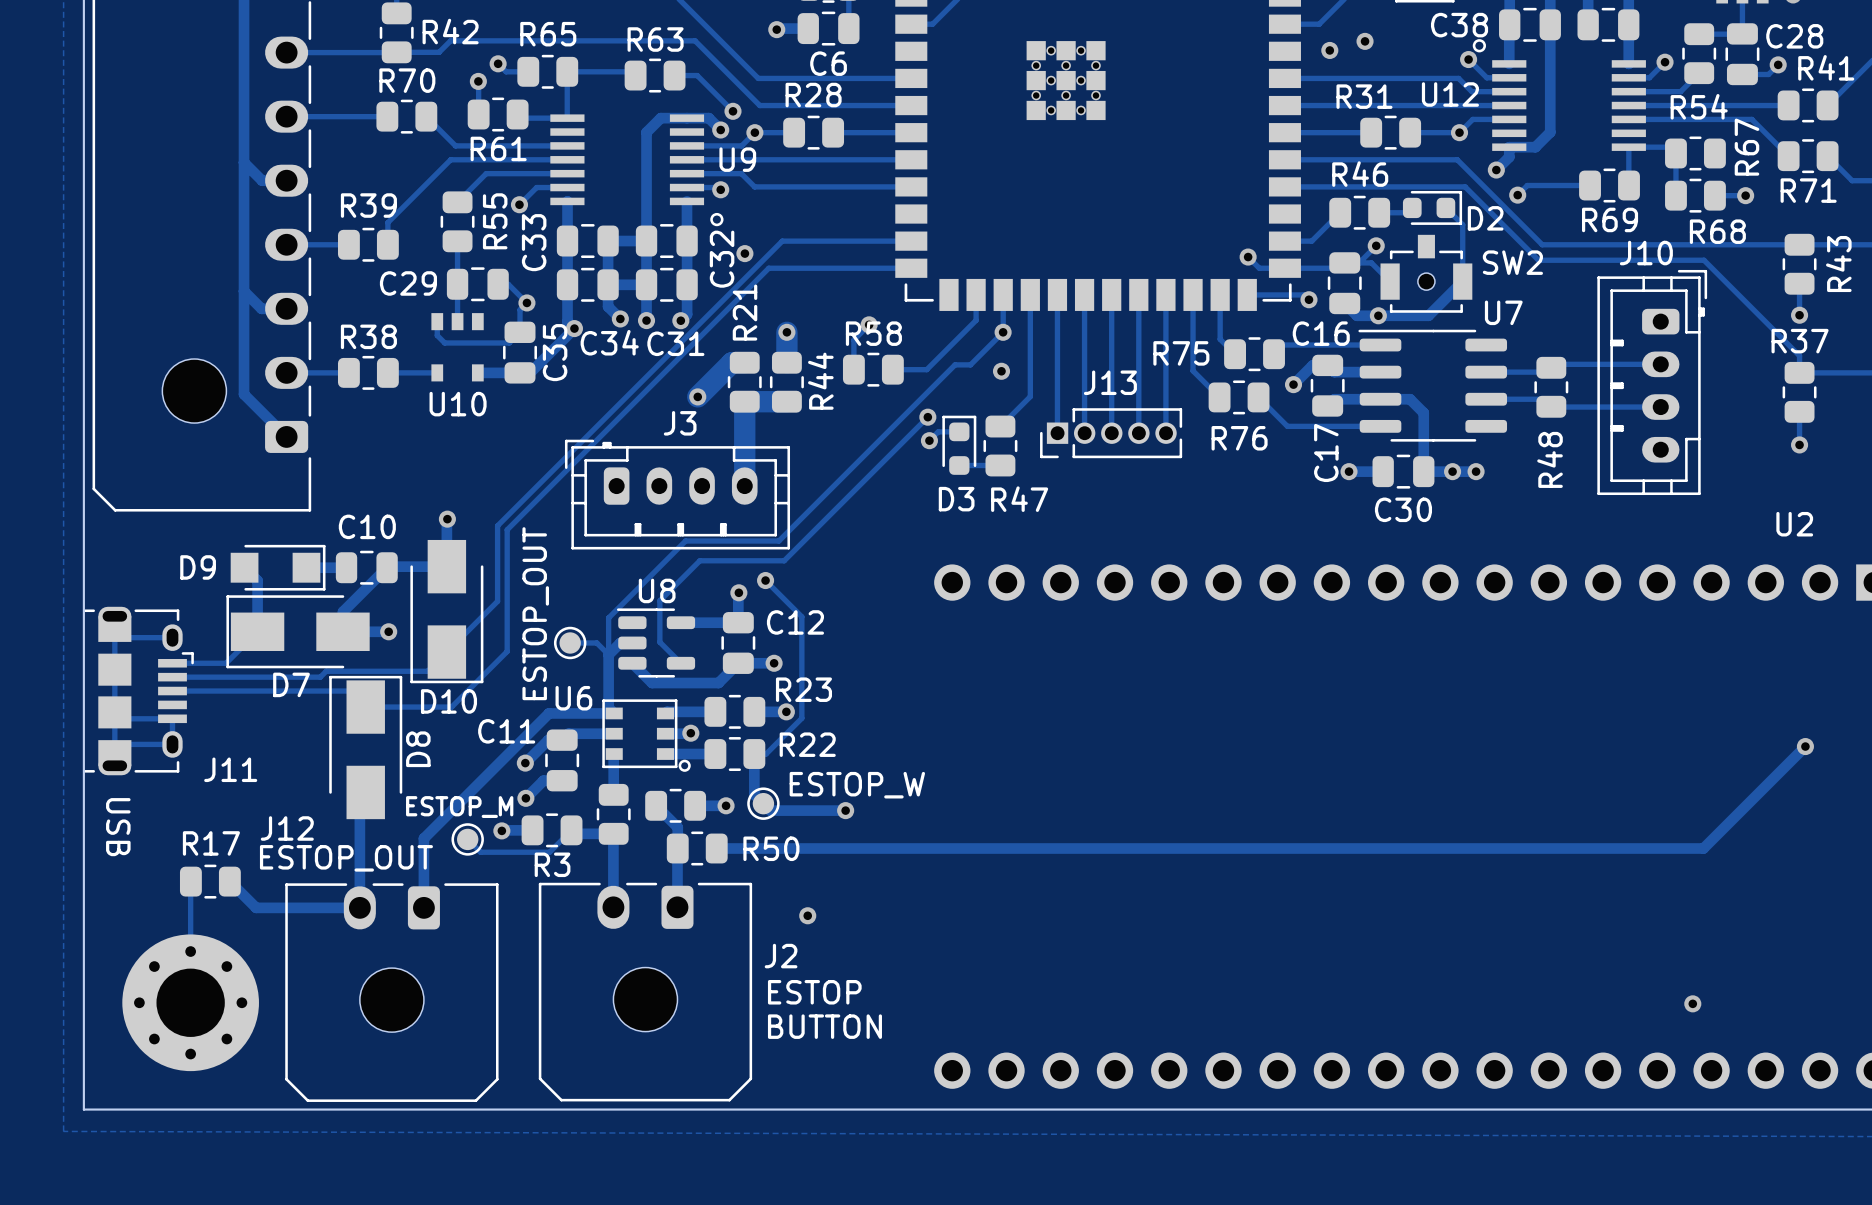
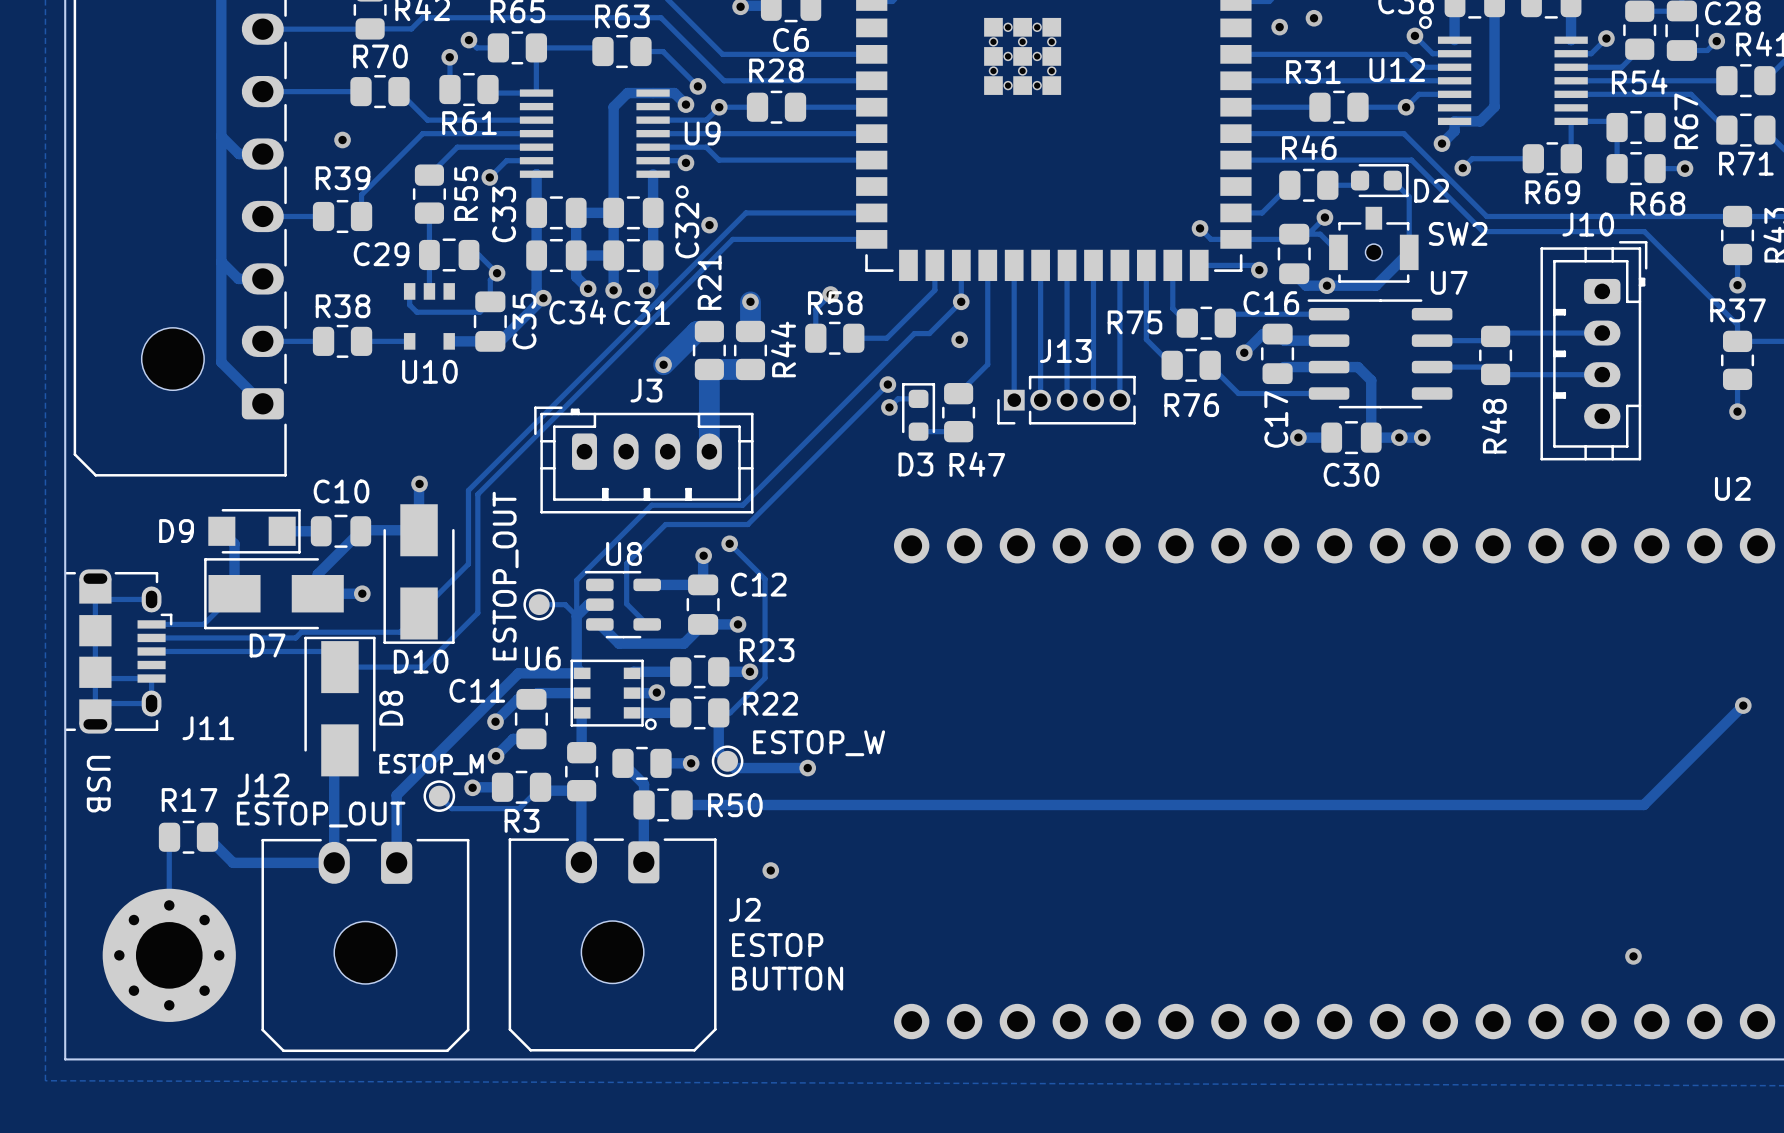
via: none -> (342, 140)

